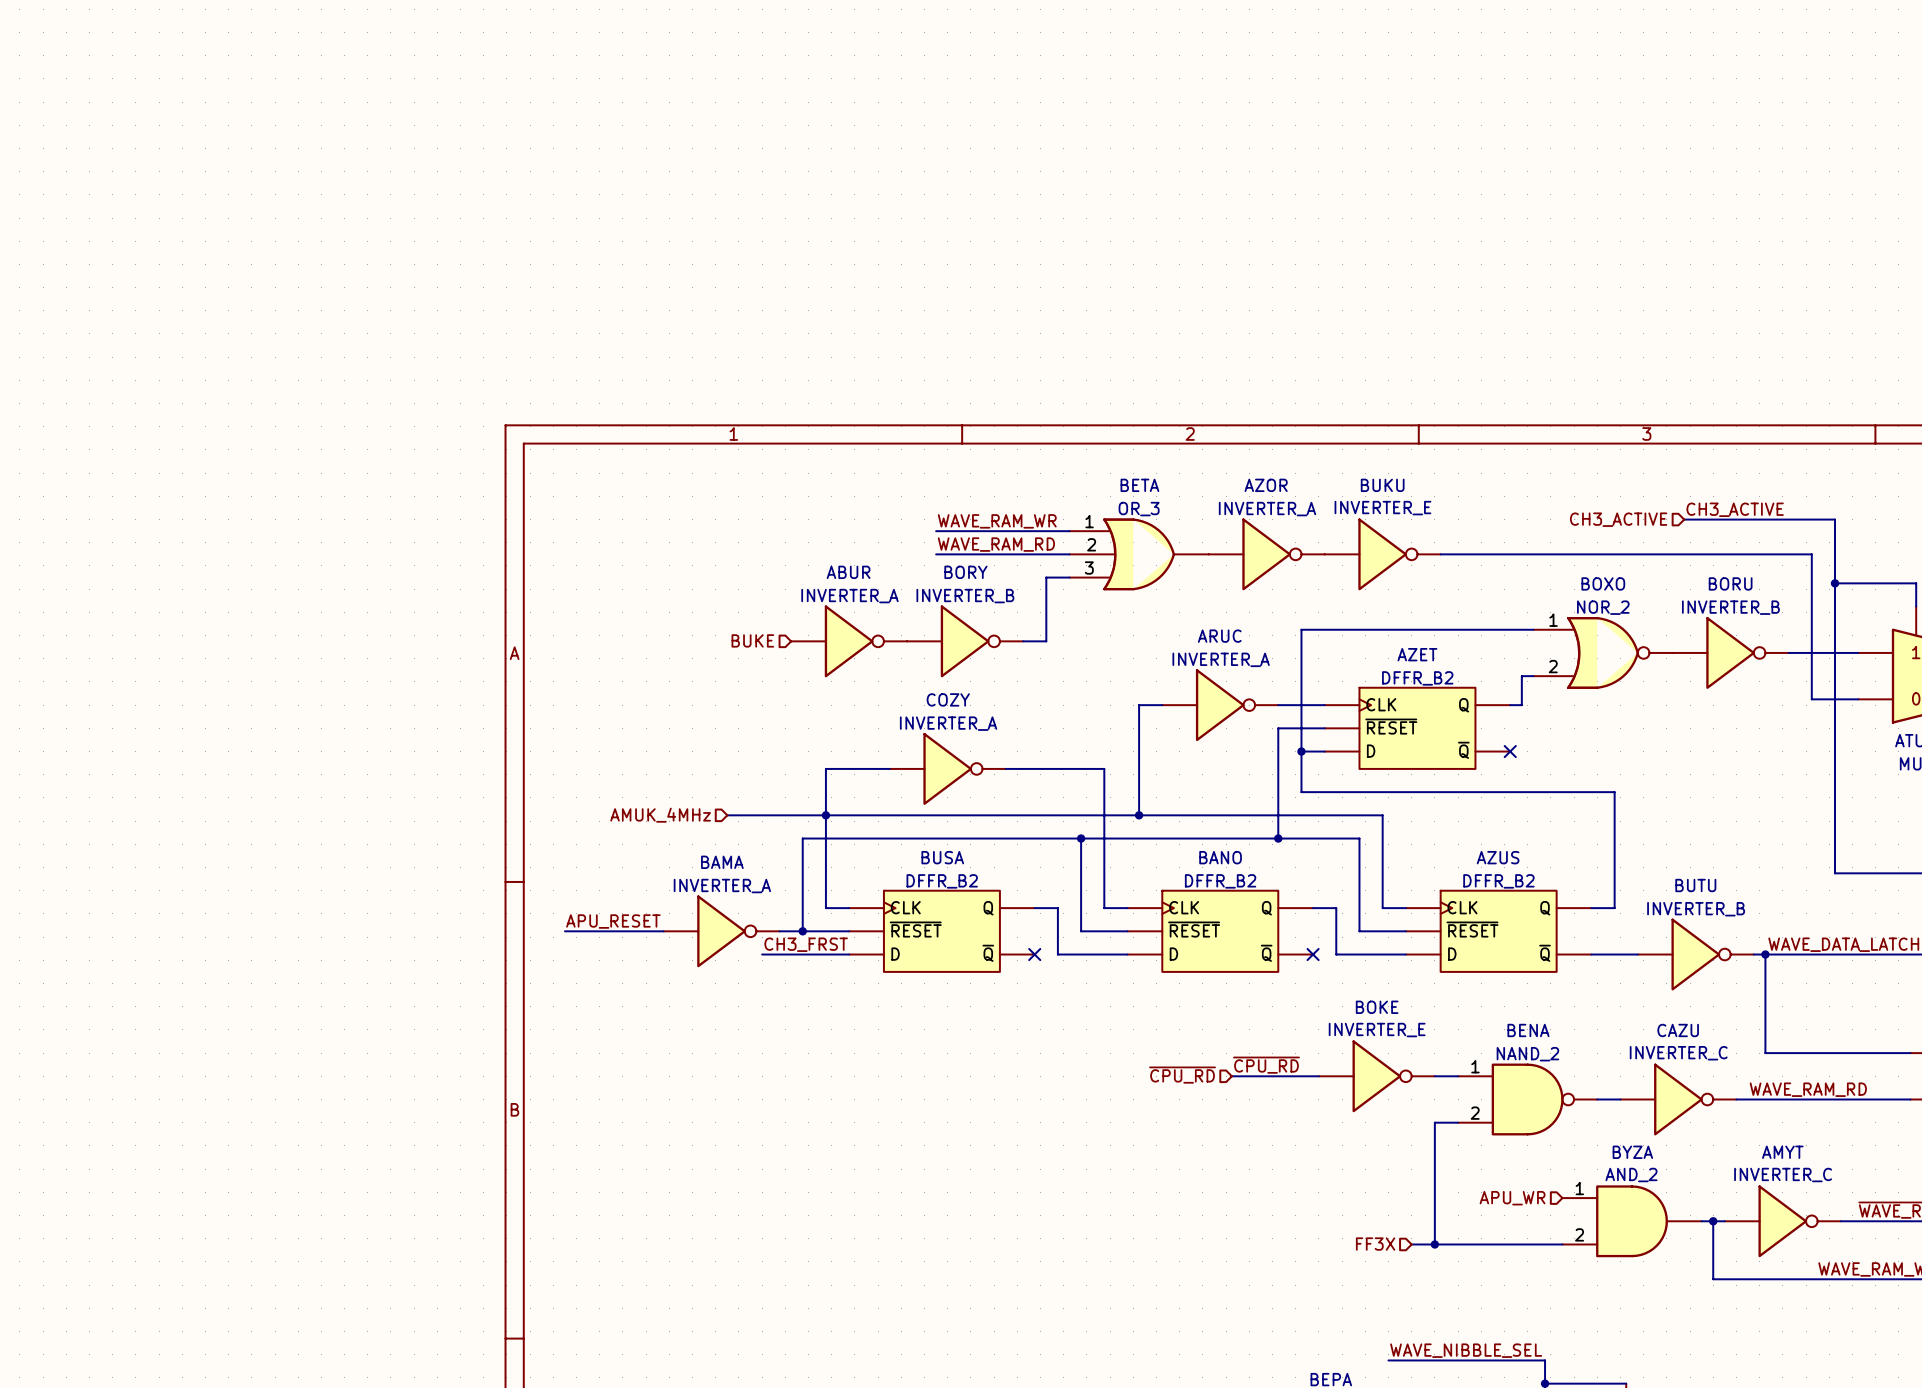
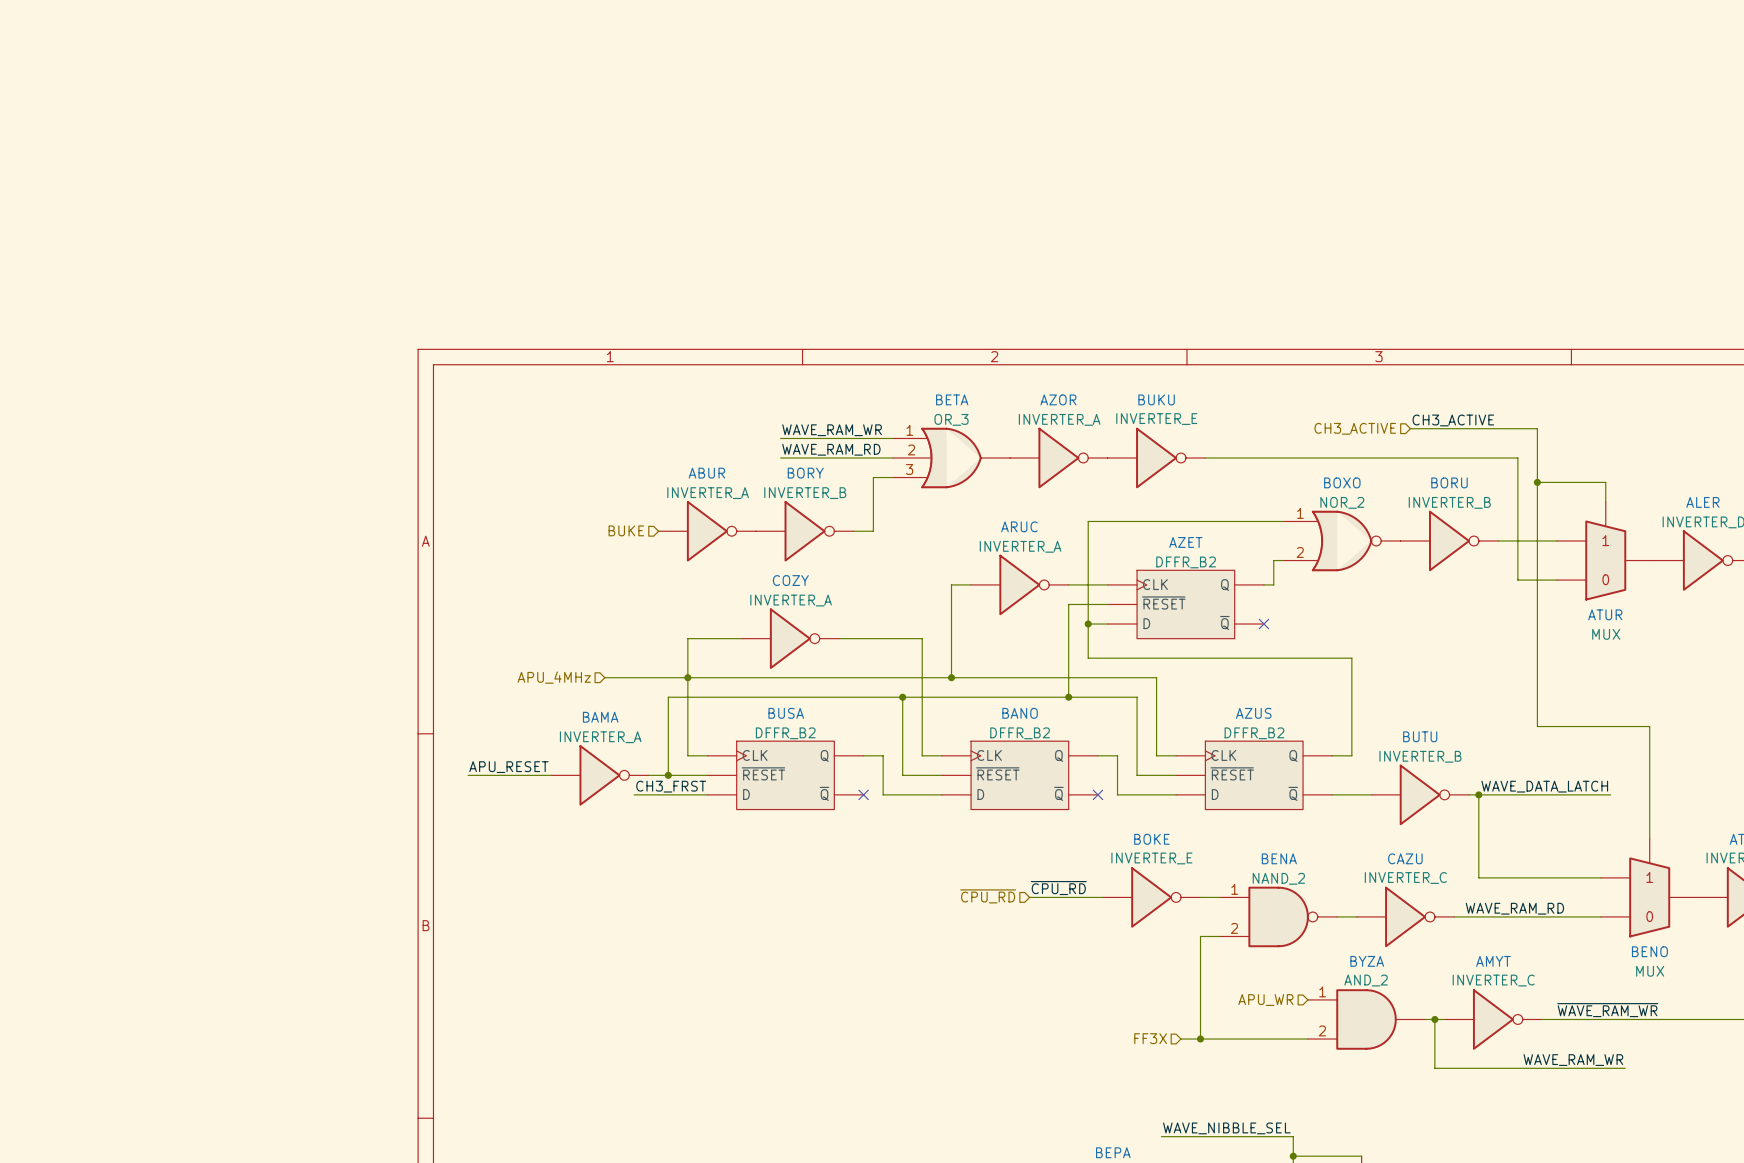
hierarchical label: AMUK_4MHz (660, 815) -> APU_4MHz (554, 677)

